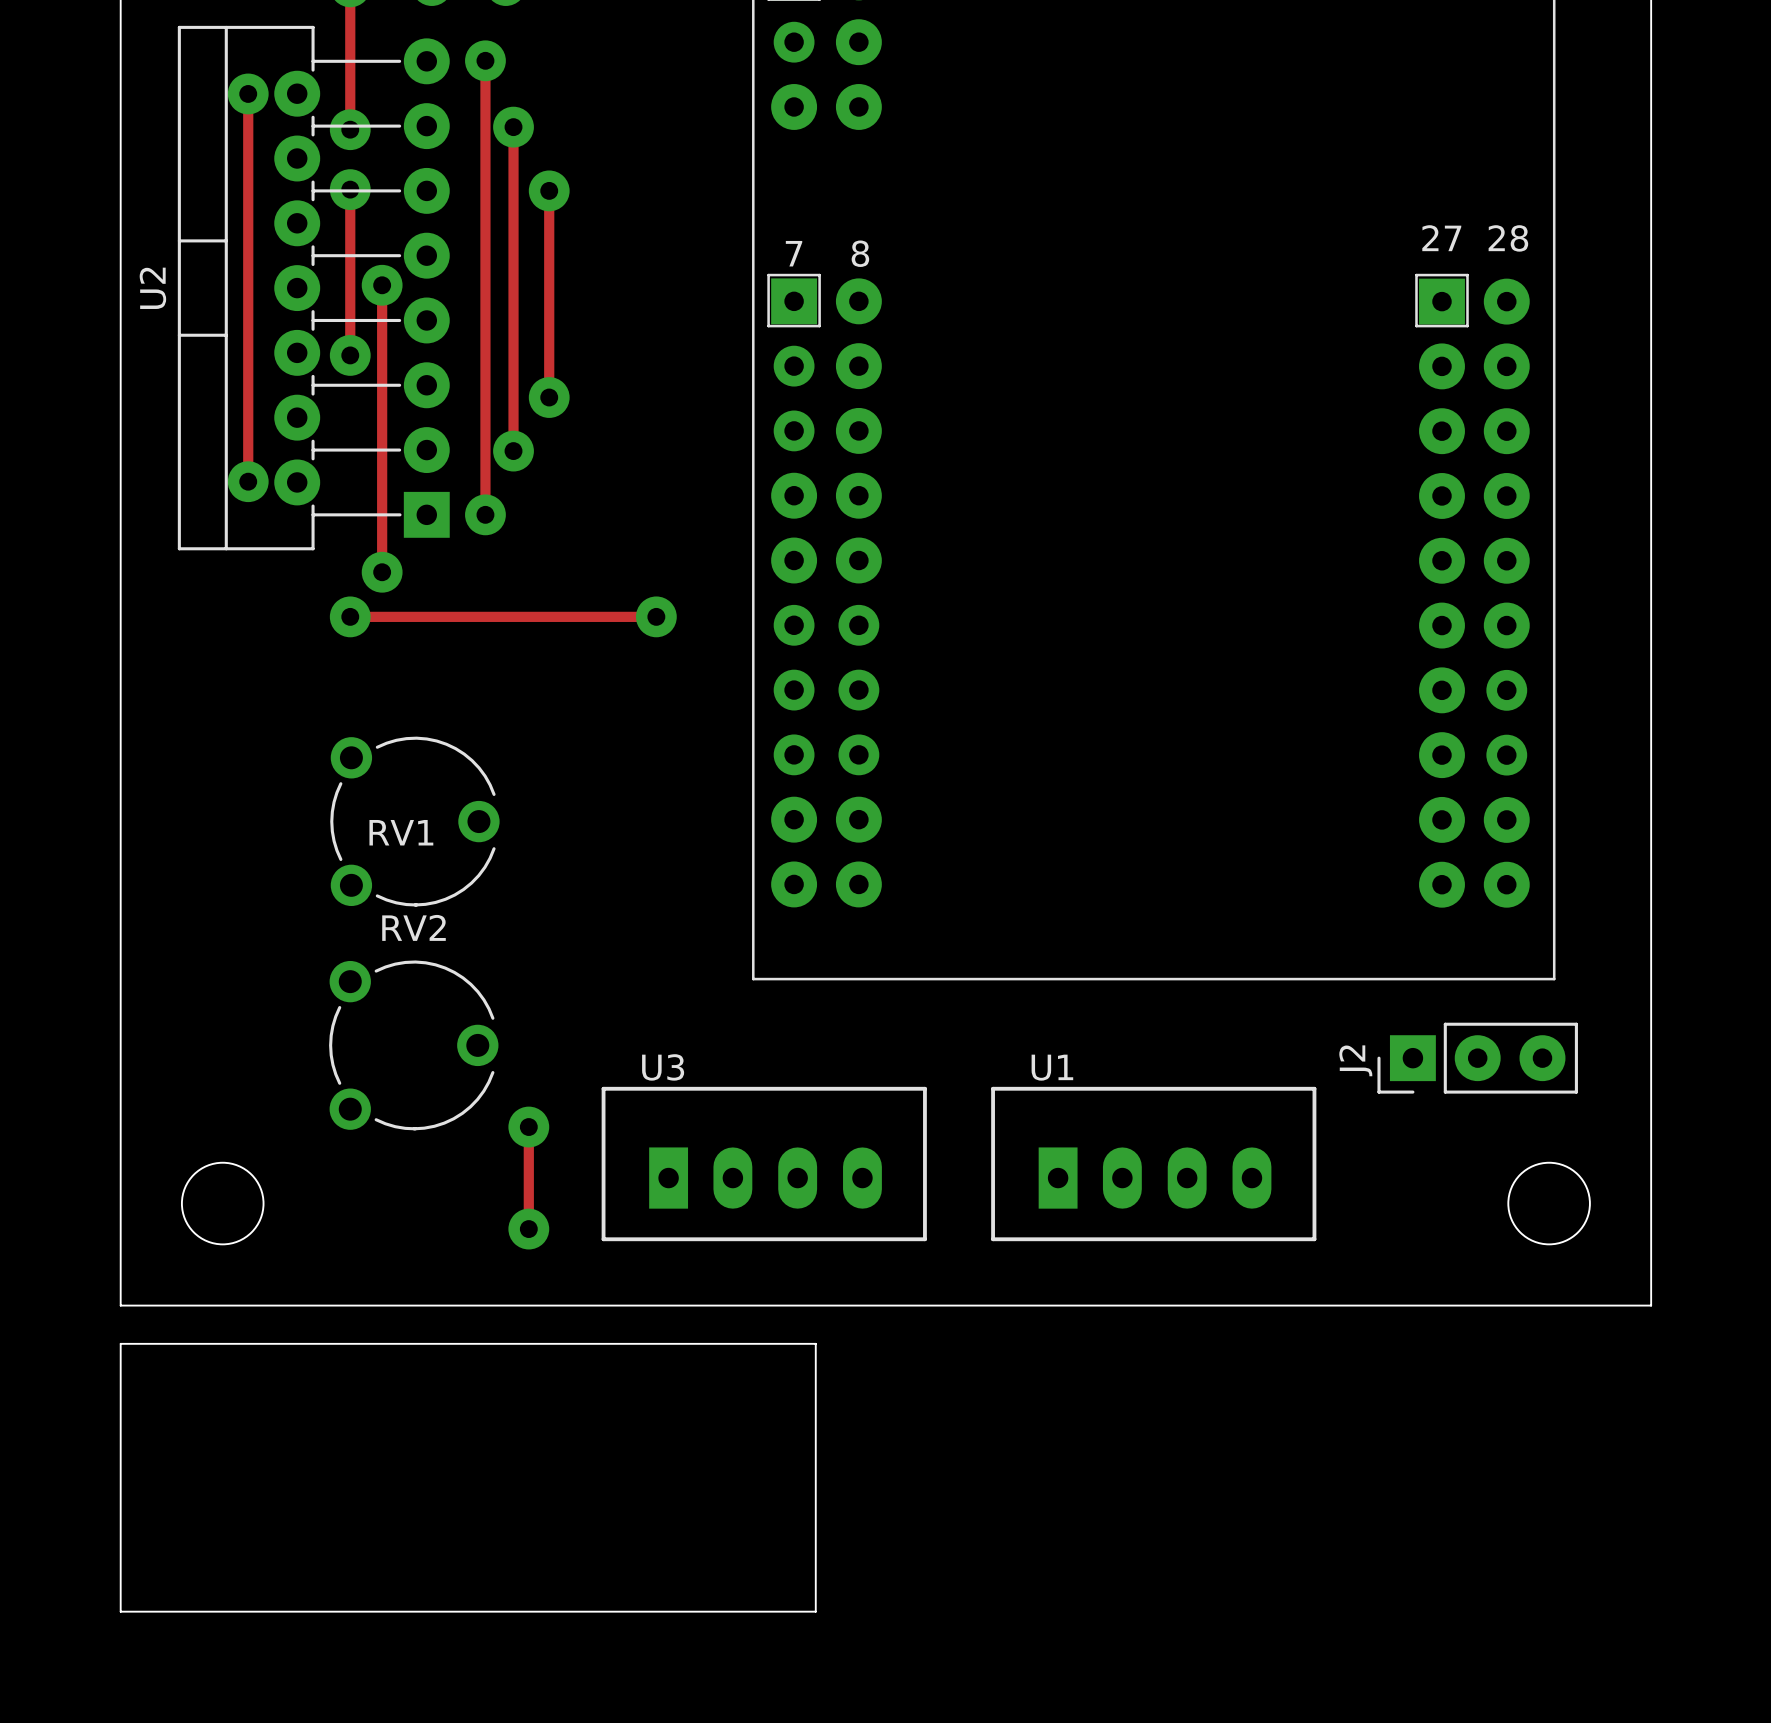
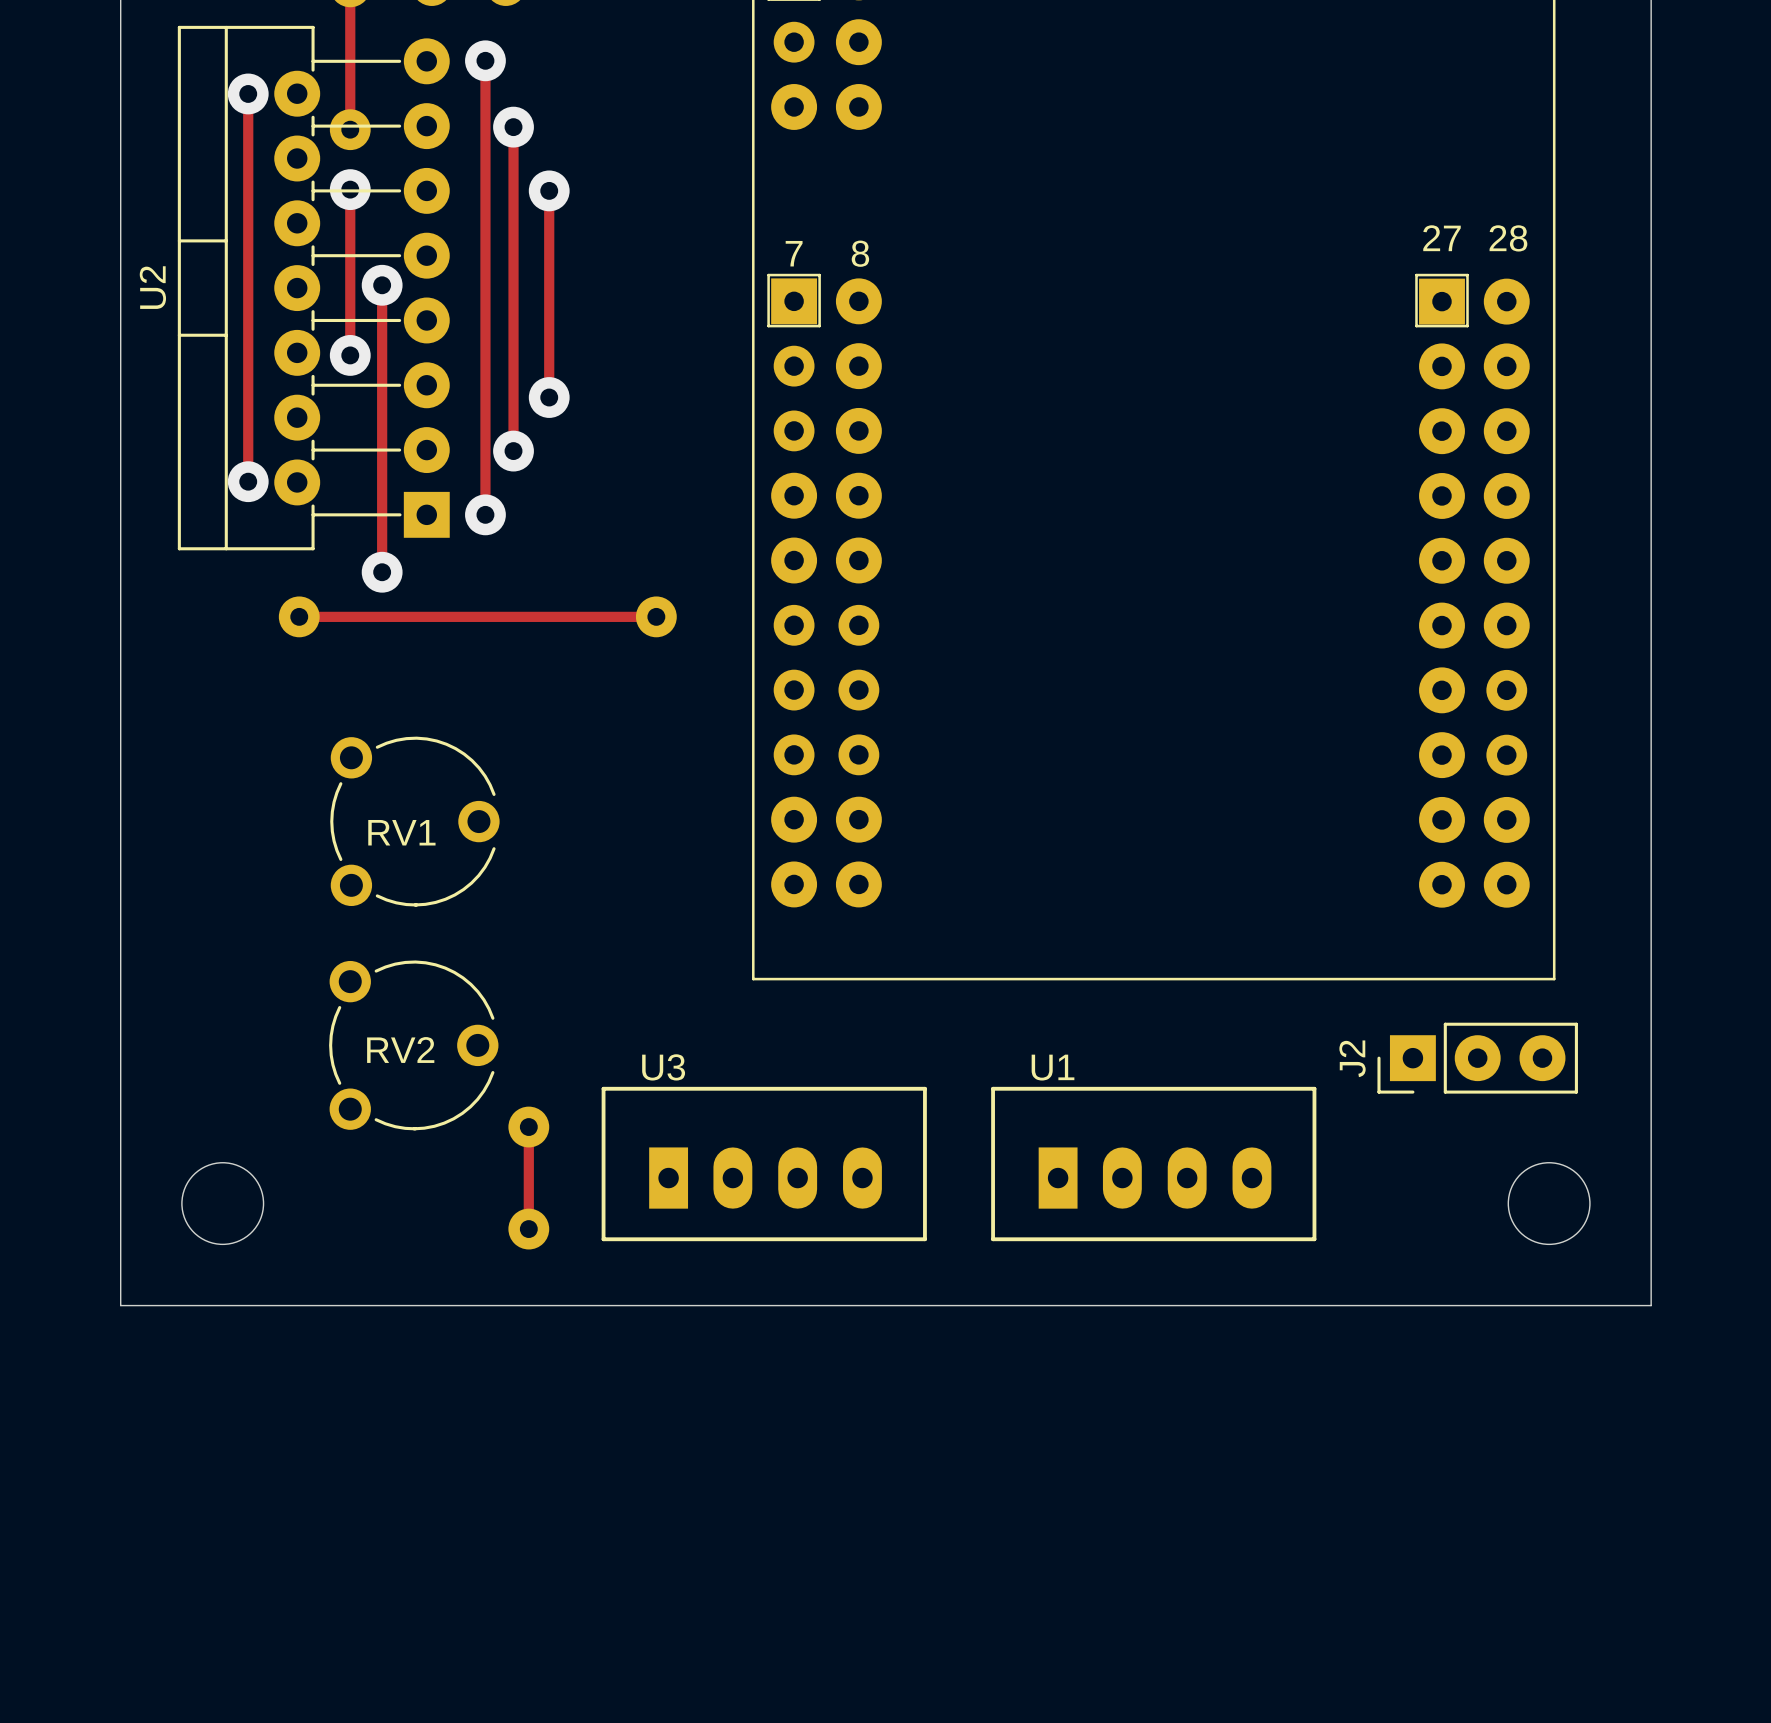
track: none -> (299, 616) (350, 616)
part position: (350, 616) -> (299, 616)
RV2 name position: RV2 (414, 927) -> RV2 (400, 1050)
board edge: (120, 1343) (120, 1611) (815, 1611) (815, 1343) (120, 1343) -> none

